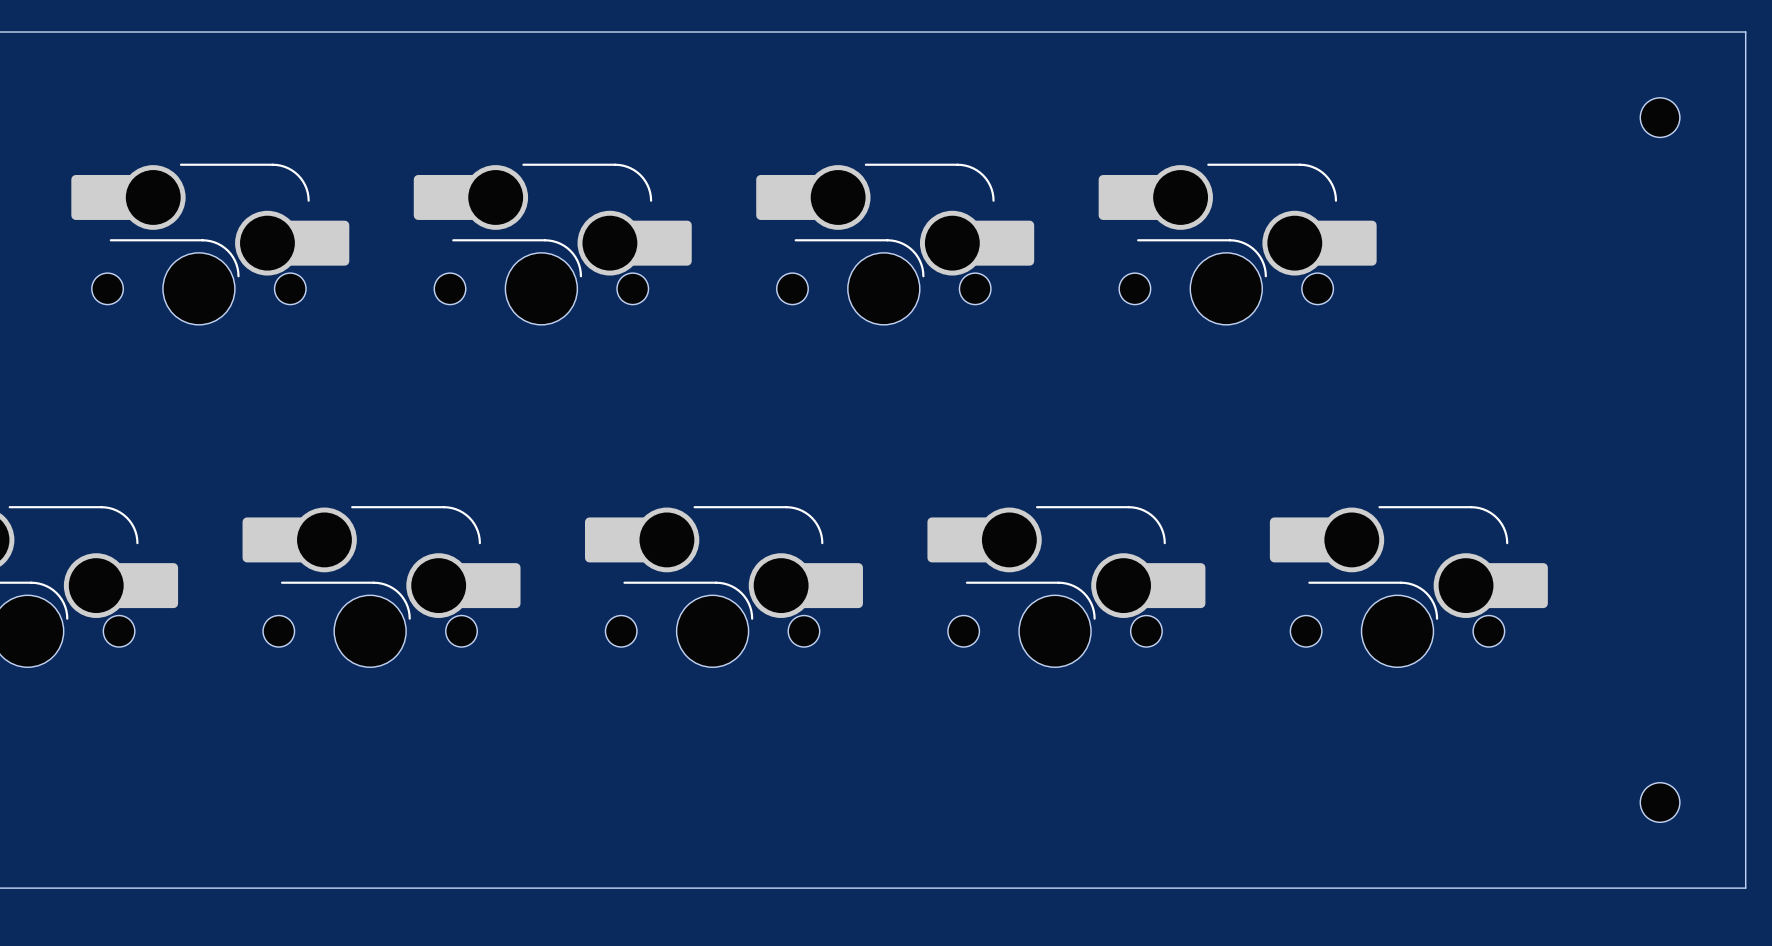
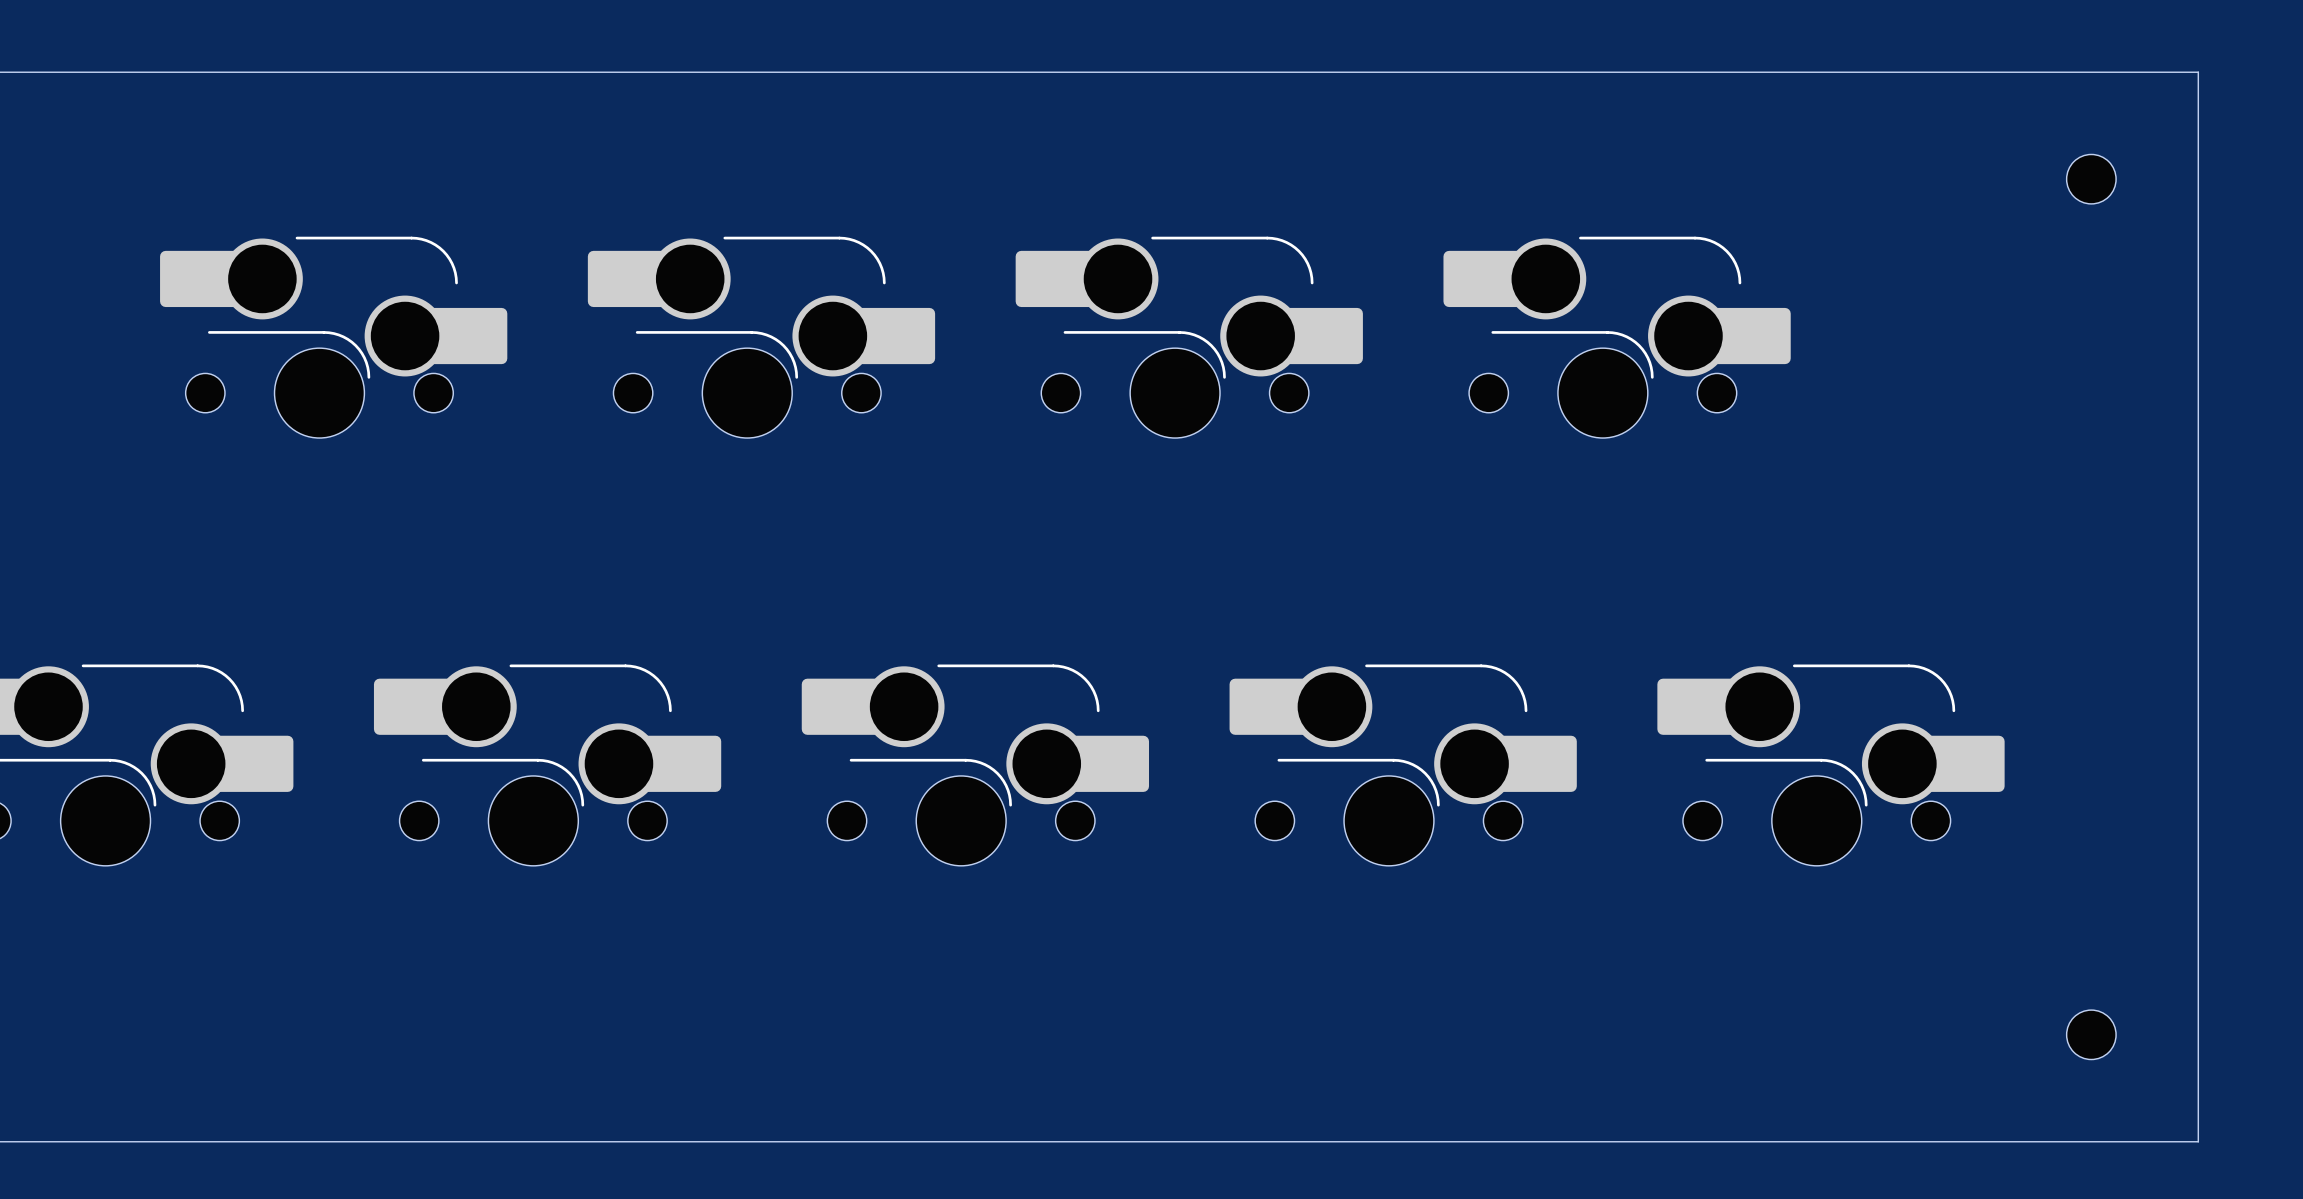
board edge: (1702, 32) (1745, 32) (1745, 888) (1702, 888) -> (2198, 72) (2198, 1141)
part position: (1660, 117) -> (2091, 179)
part position: (1660, 802) -> (2091, 1034)

